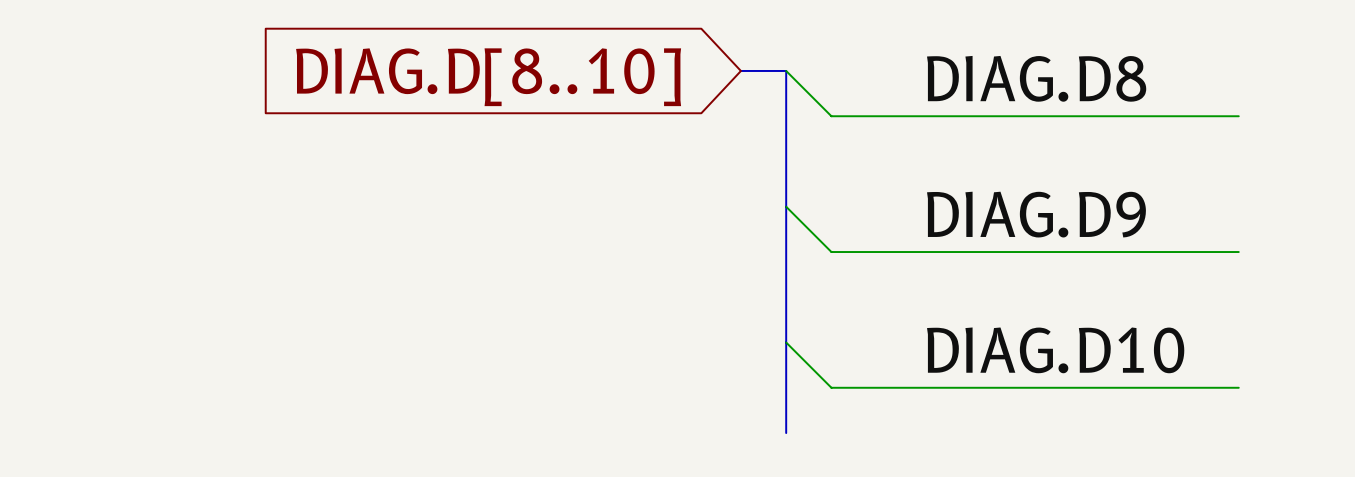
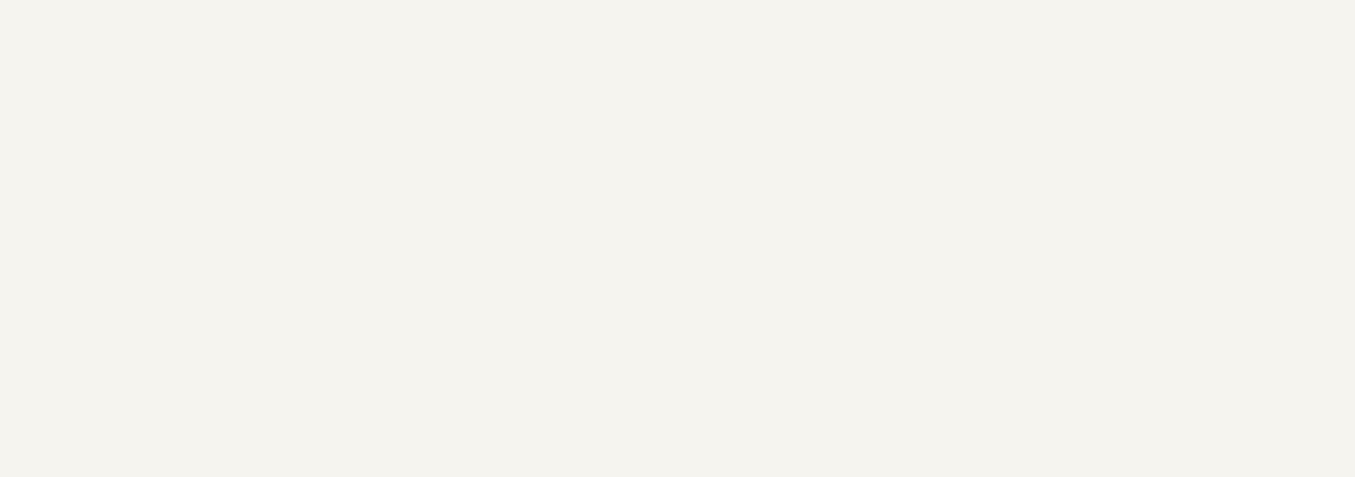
bus: (740, 70) (786, 70) (786, 433) -> none
wire: (786, 70) (831, 116) (1238, 116) -> none
global label: DIAG.D[8..10] (488, 77) -> none
label: DIAG.D8 (1036, 78) -> none
wire: (786, 206) (831, 252) (1238, 252) -> none
label: DIAG.D9 (1036, 214) -> none
wire: (786, 342) (831, 387) (1238, 387) -> none
label: DIAG.D10 (1055, 350) -> none

